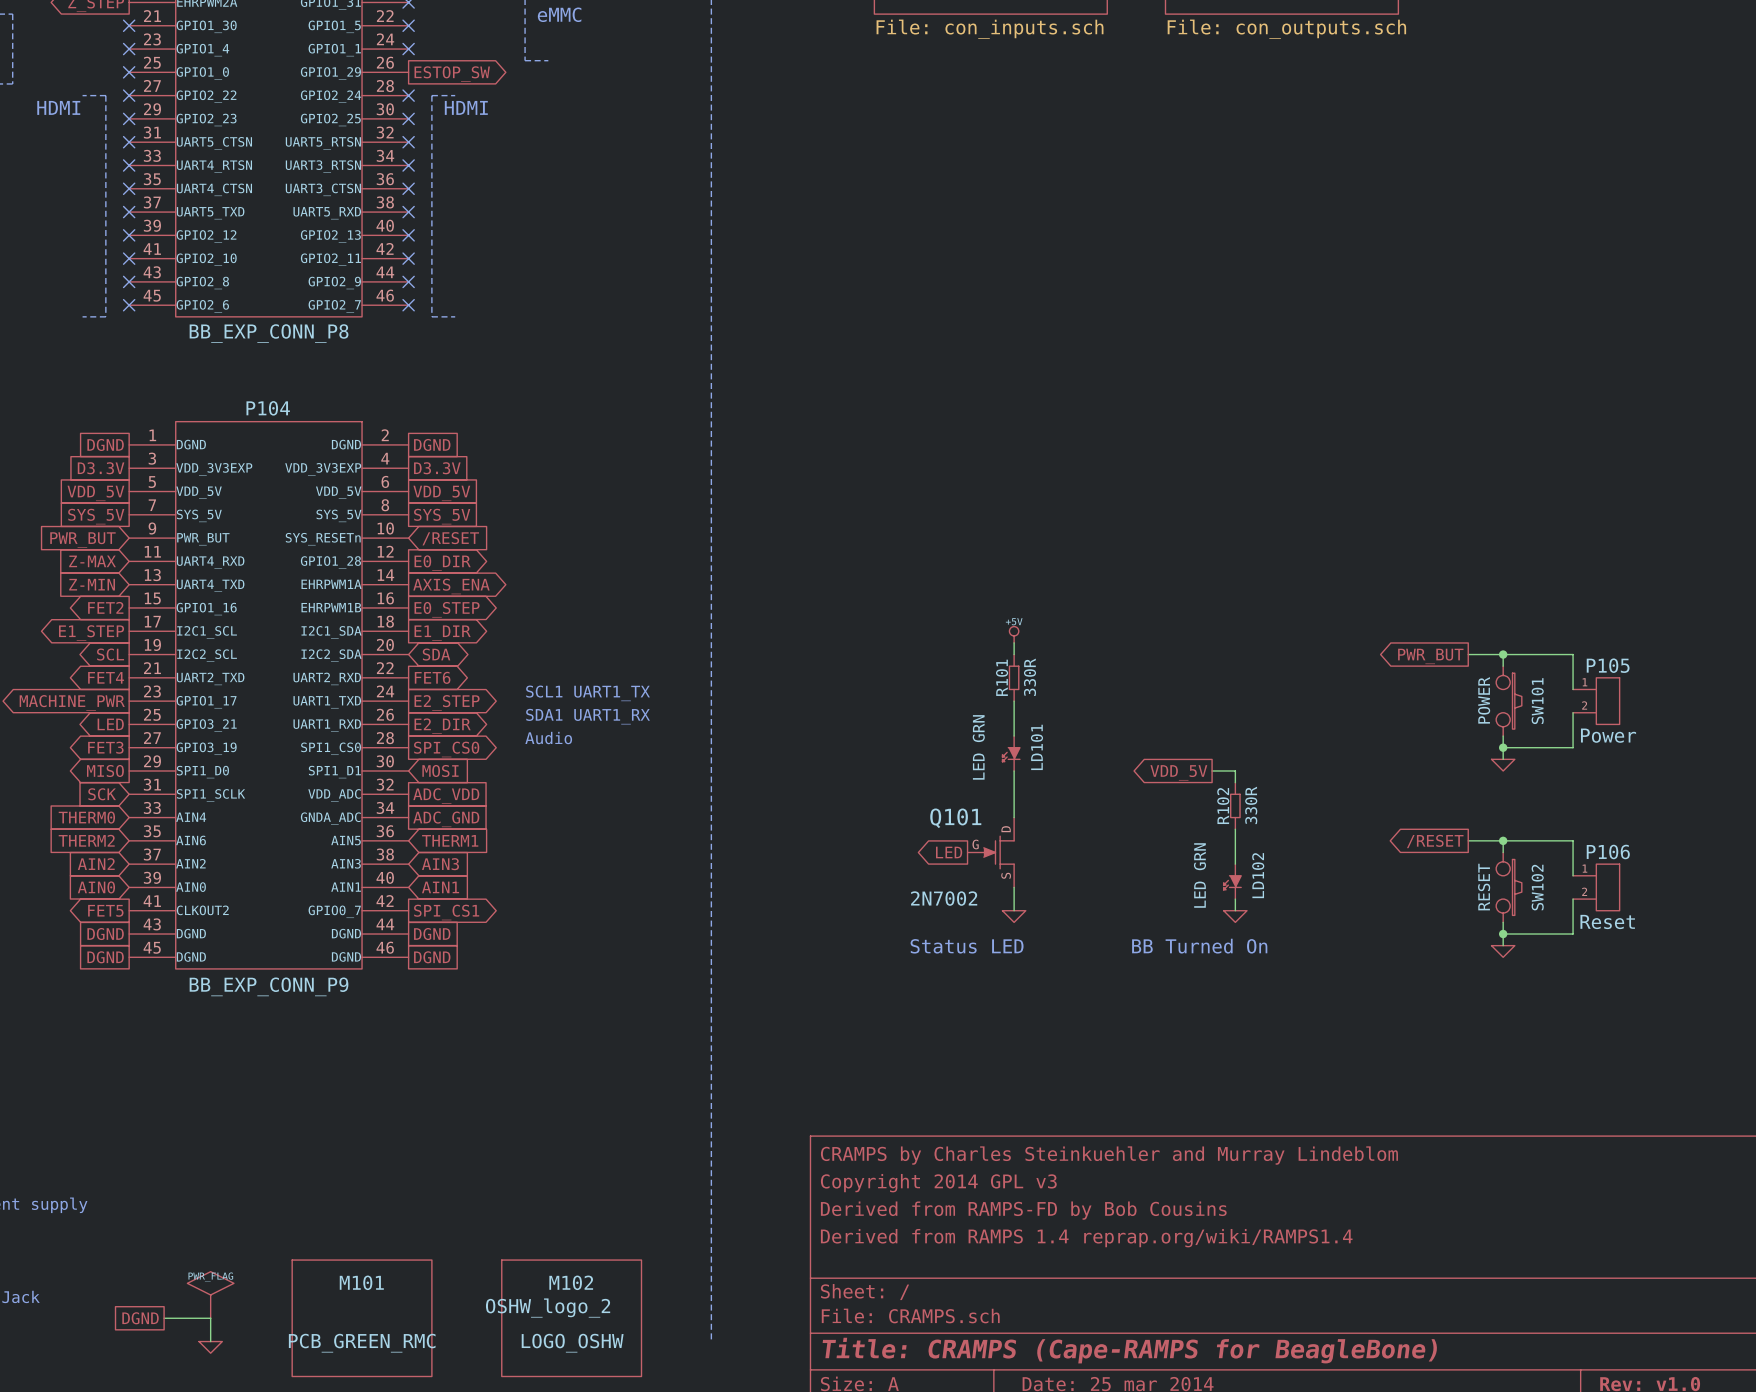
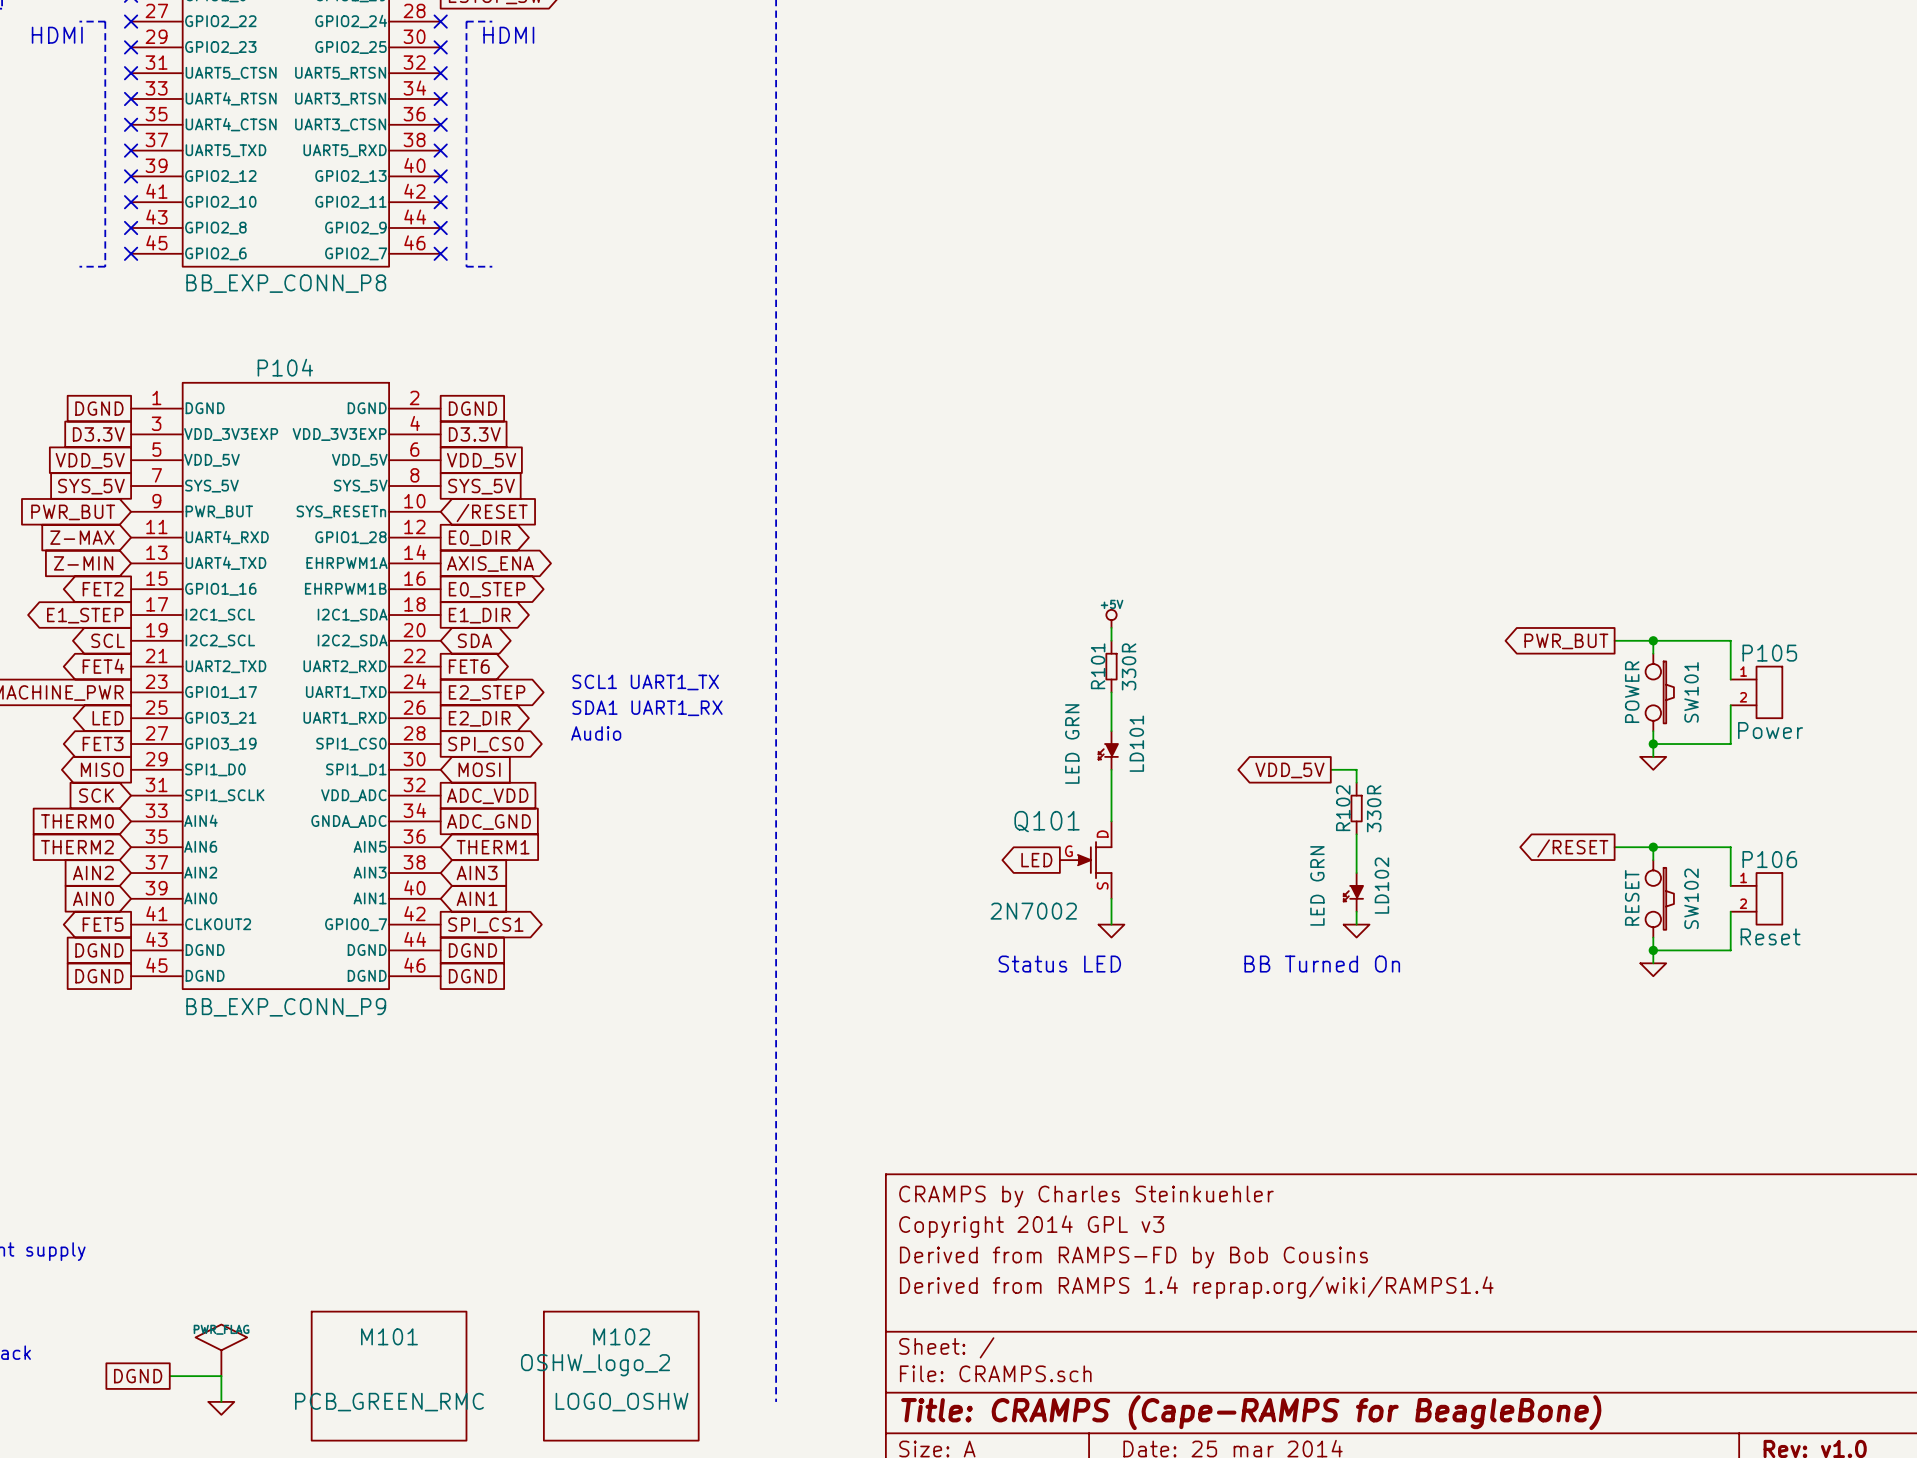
title block: CRAMPS by Charles Steinkuehler and Murray Lindeblom (1109, 1155) -> CRAMPS by Charles Steinkuehler (1086, 1196)

